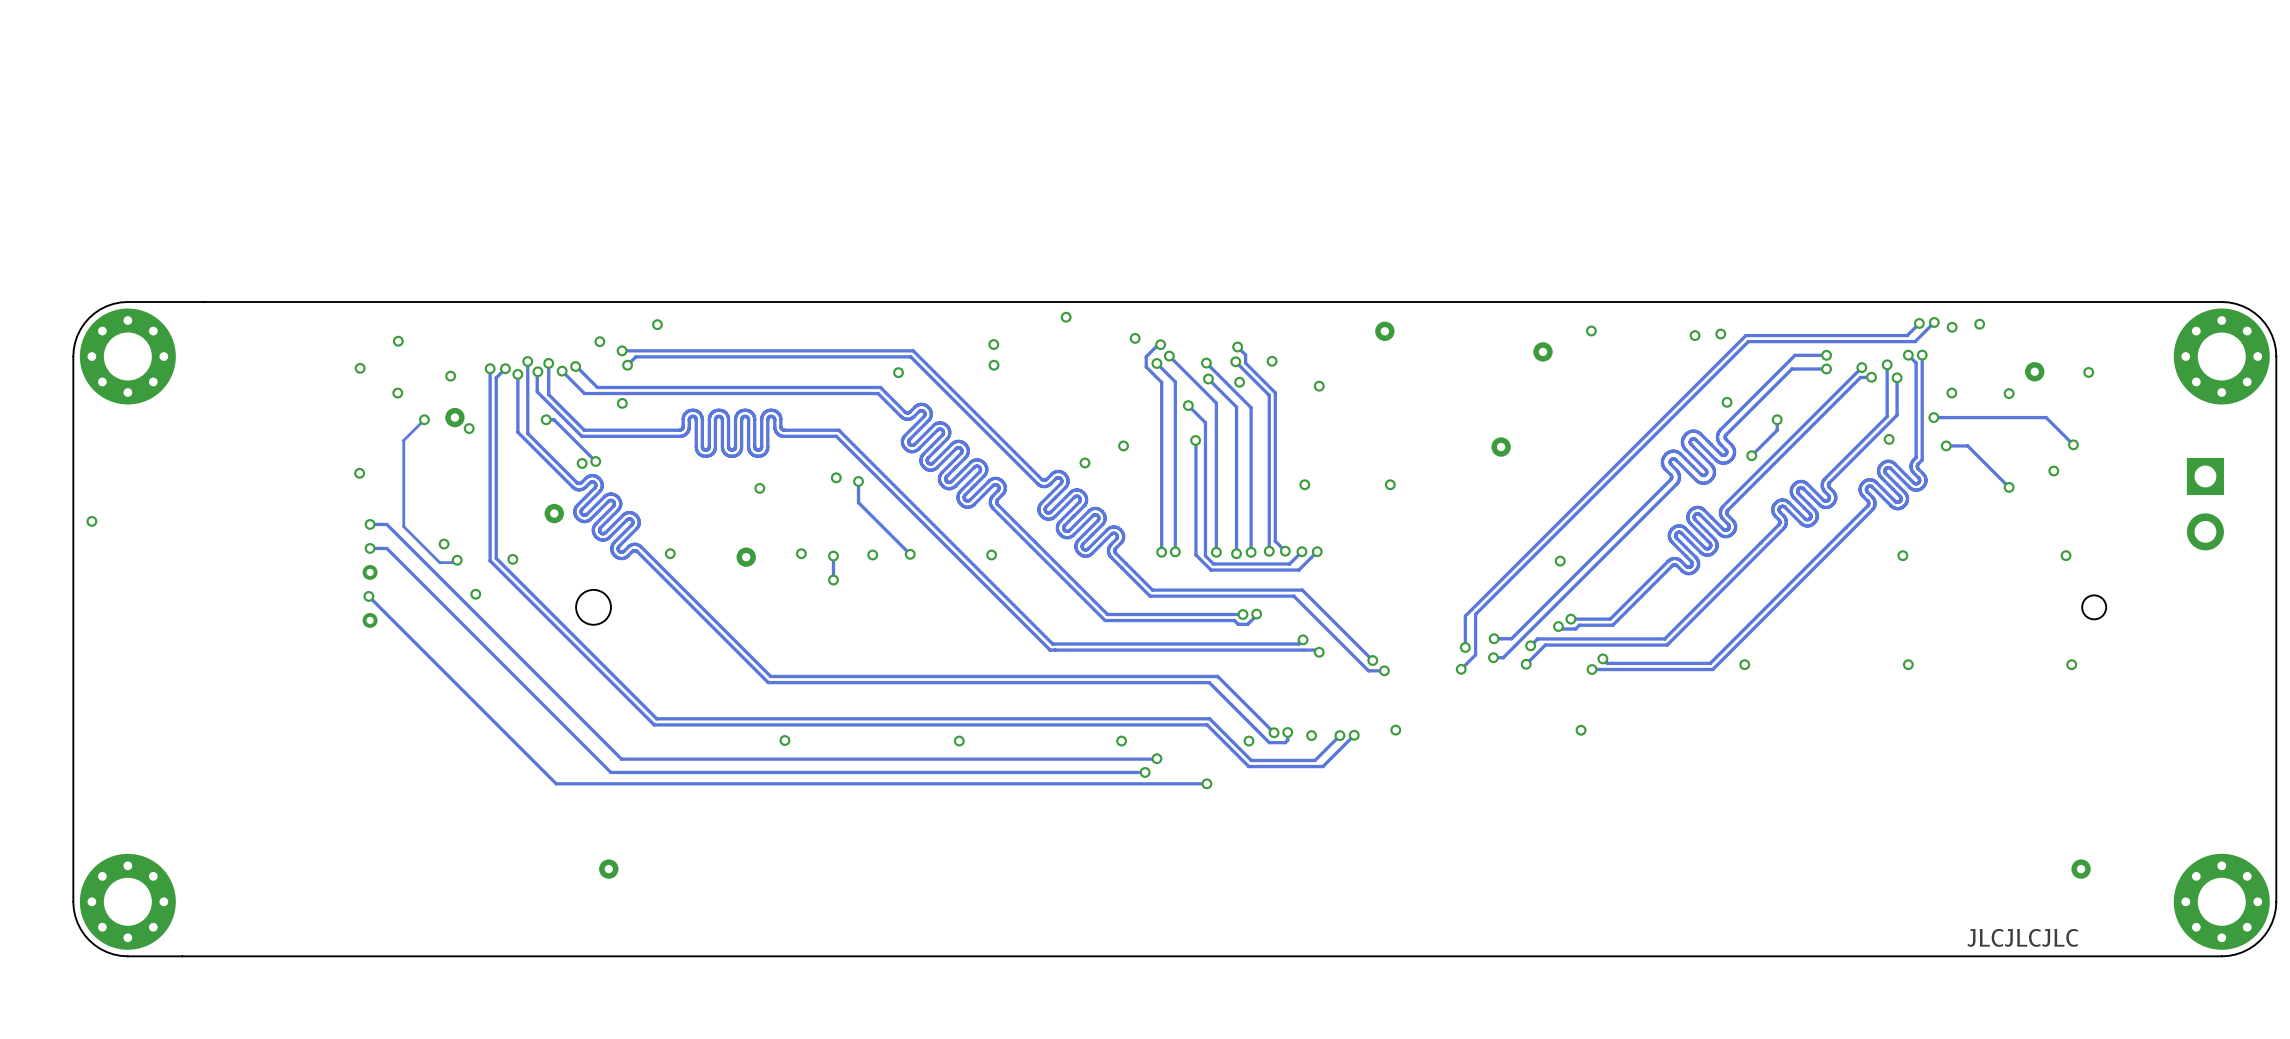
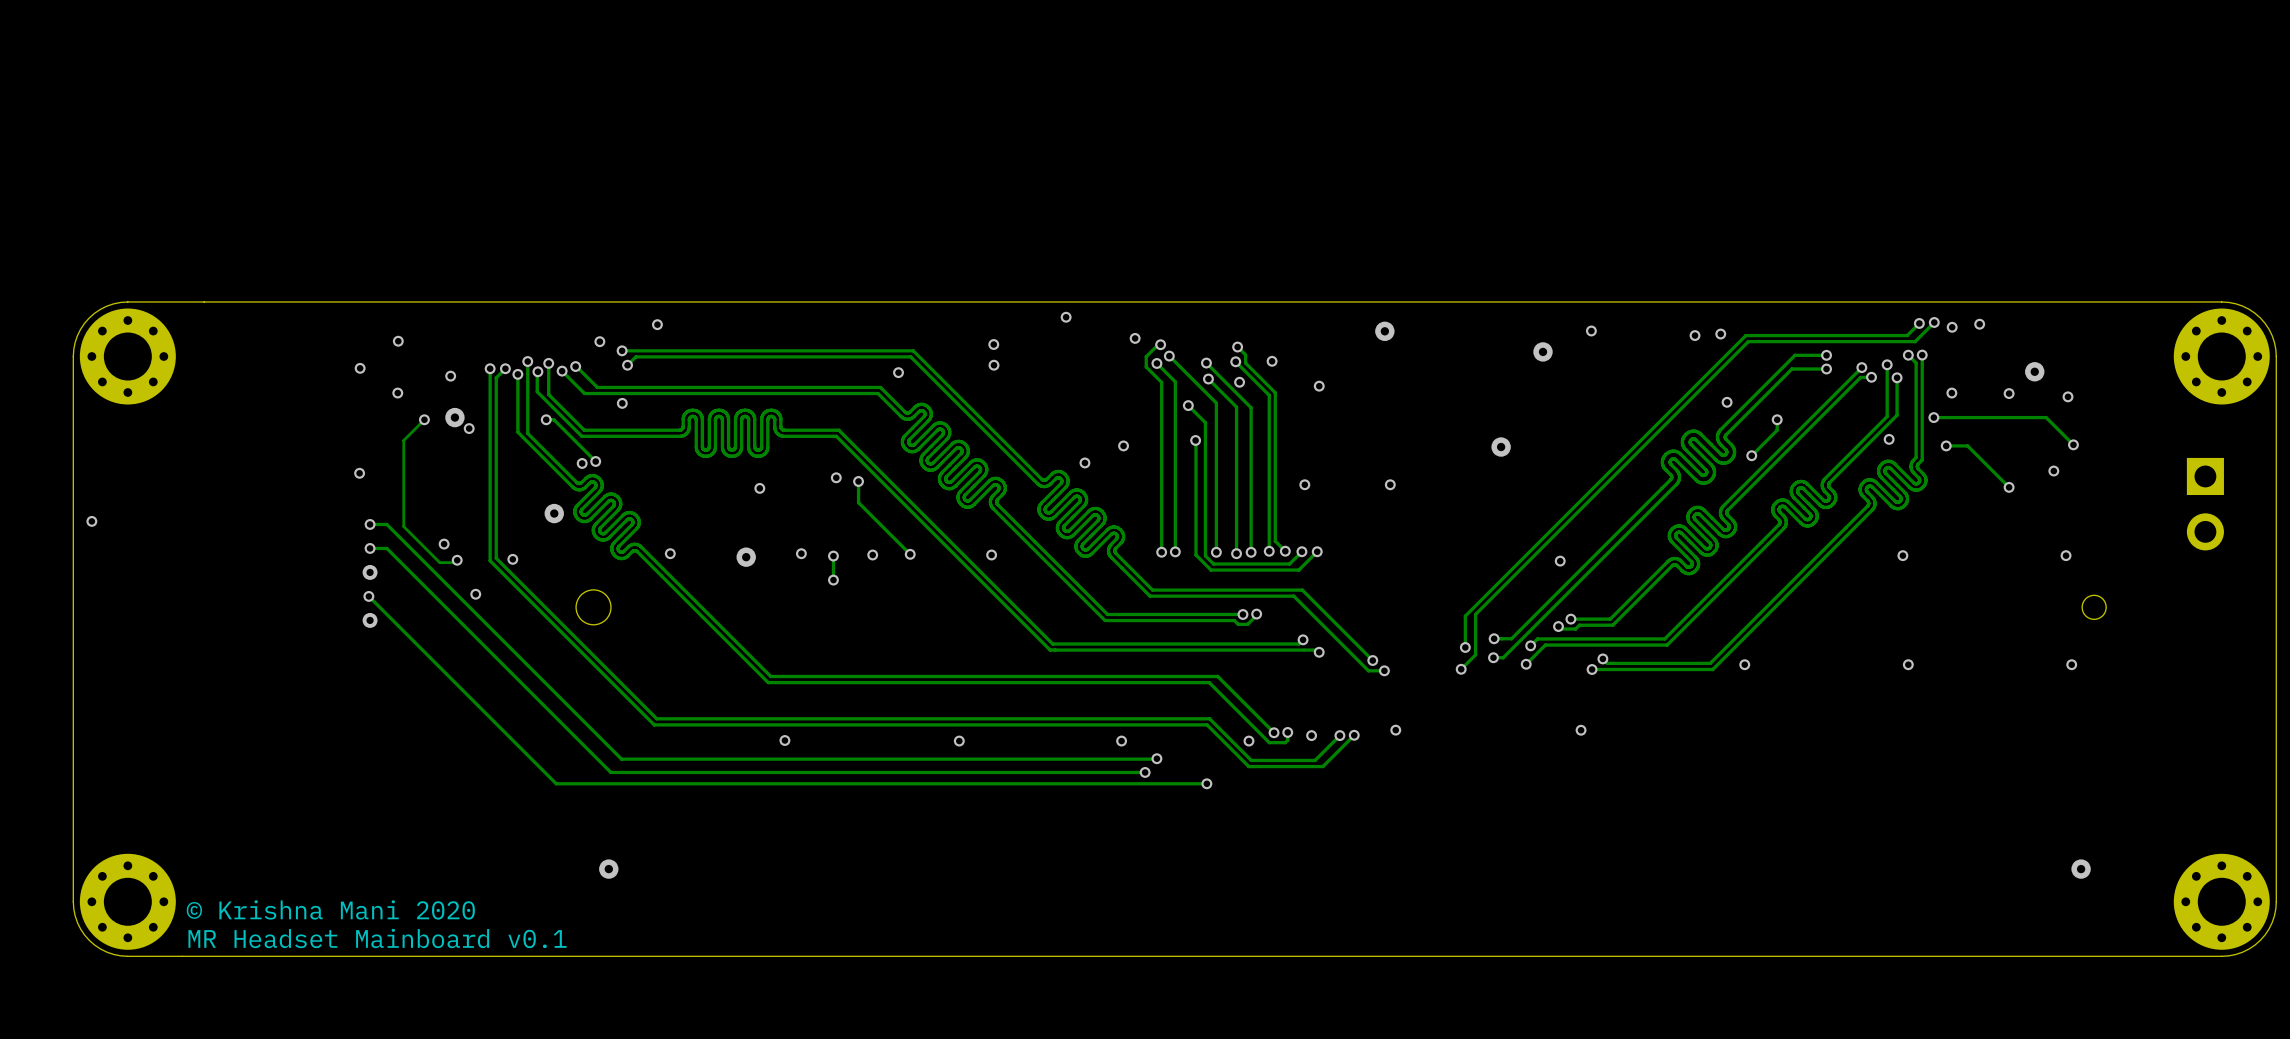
via position: (2088, 372) -> (2068, 396)
text: none -> © Krishna Mani 2020 (330, 909)
text: JLCJLCJLC (2022, 937) -> none
text: none -> MR Headset Mainboard v0.1 (377, 938)

